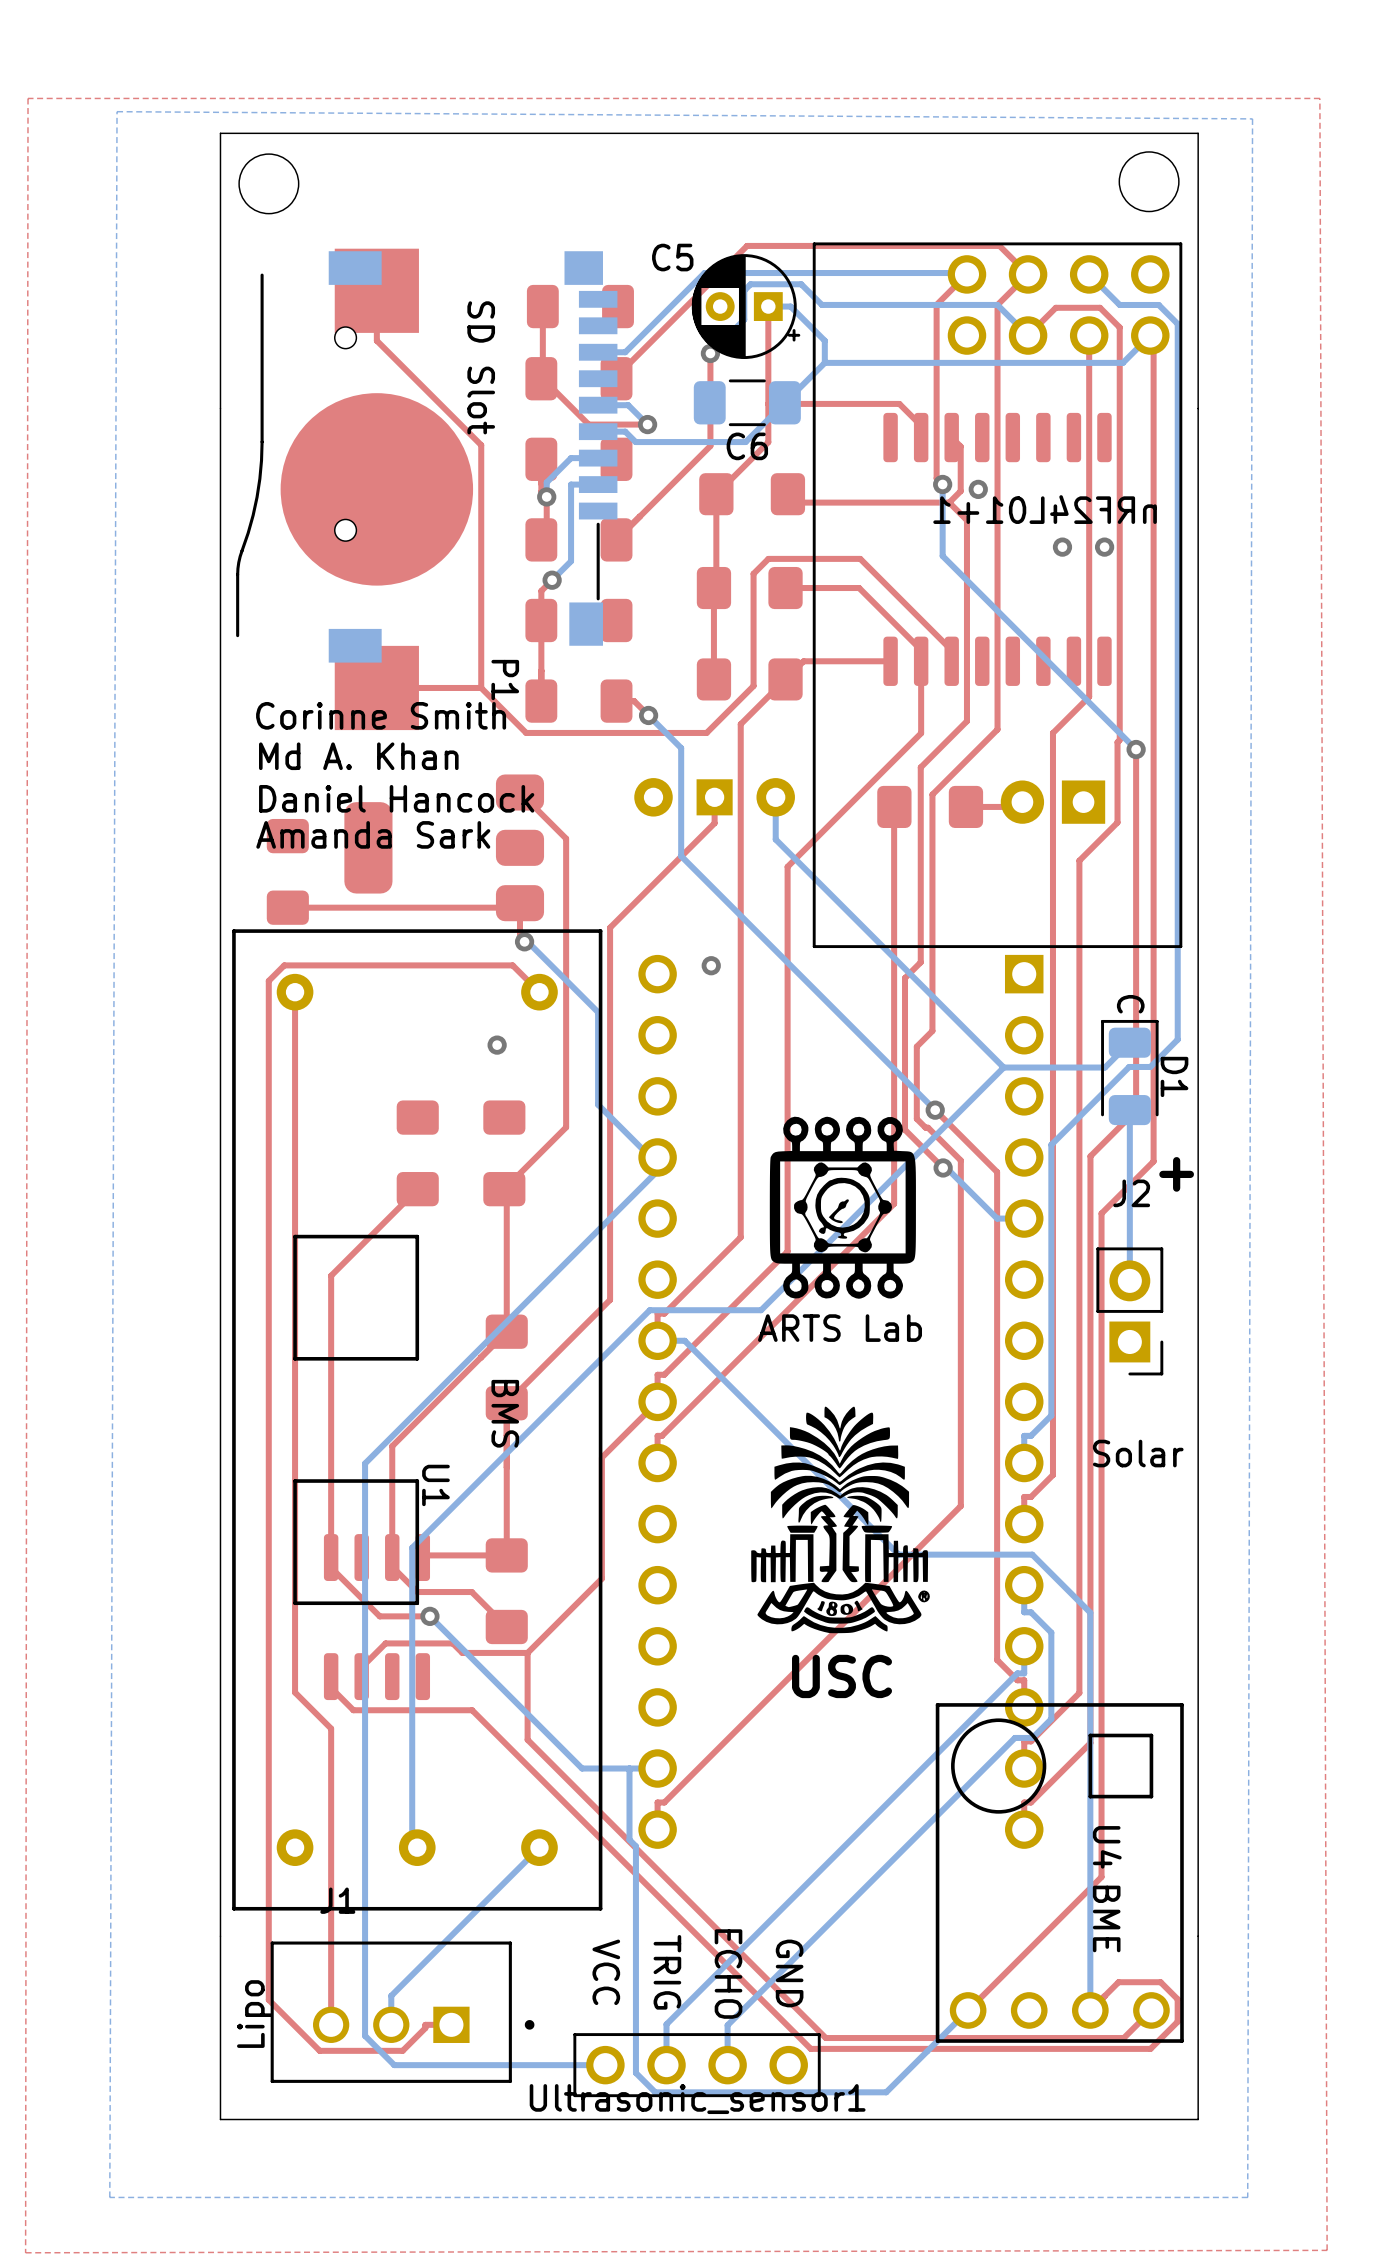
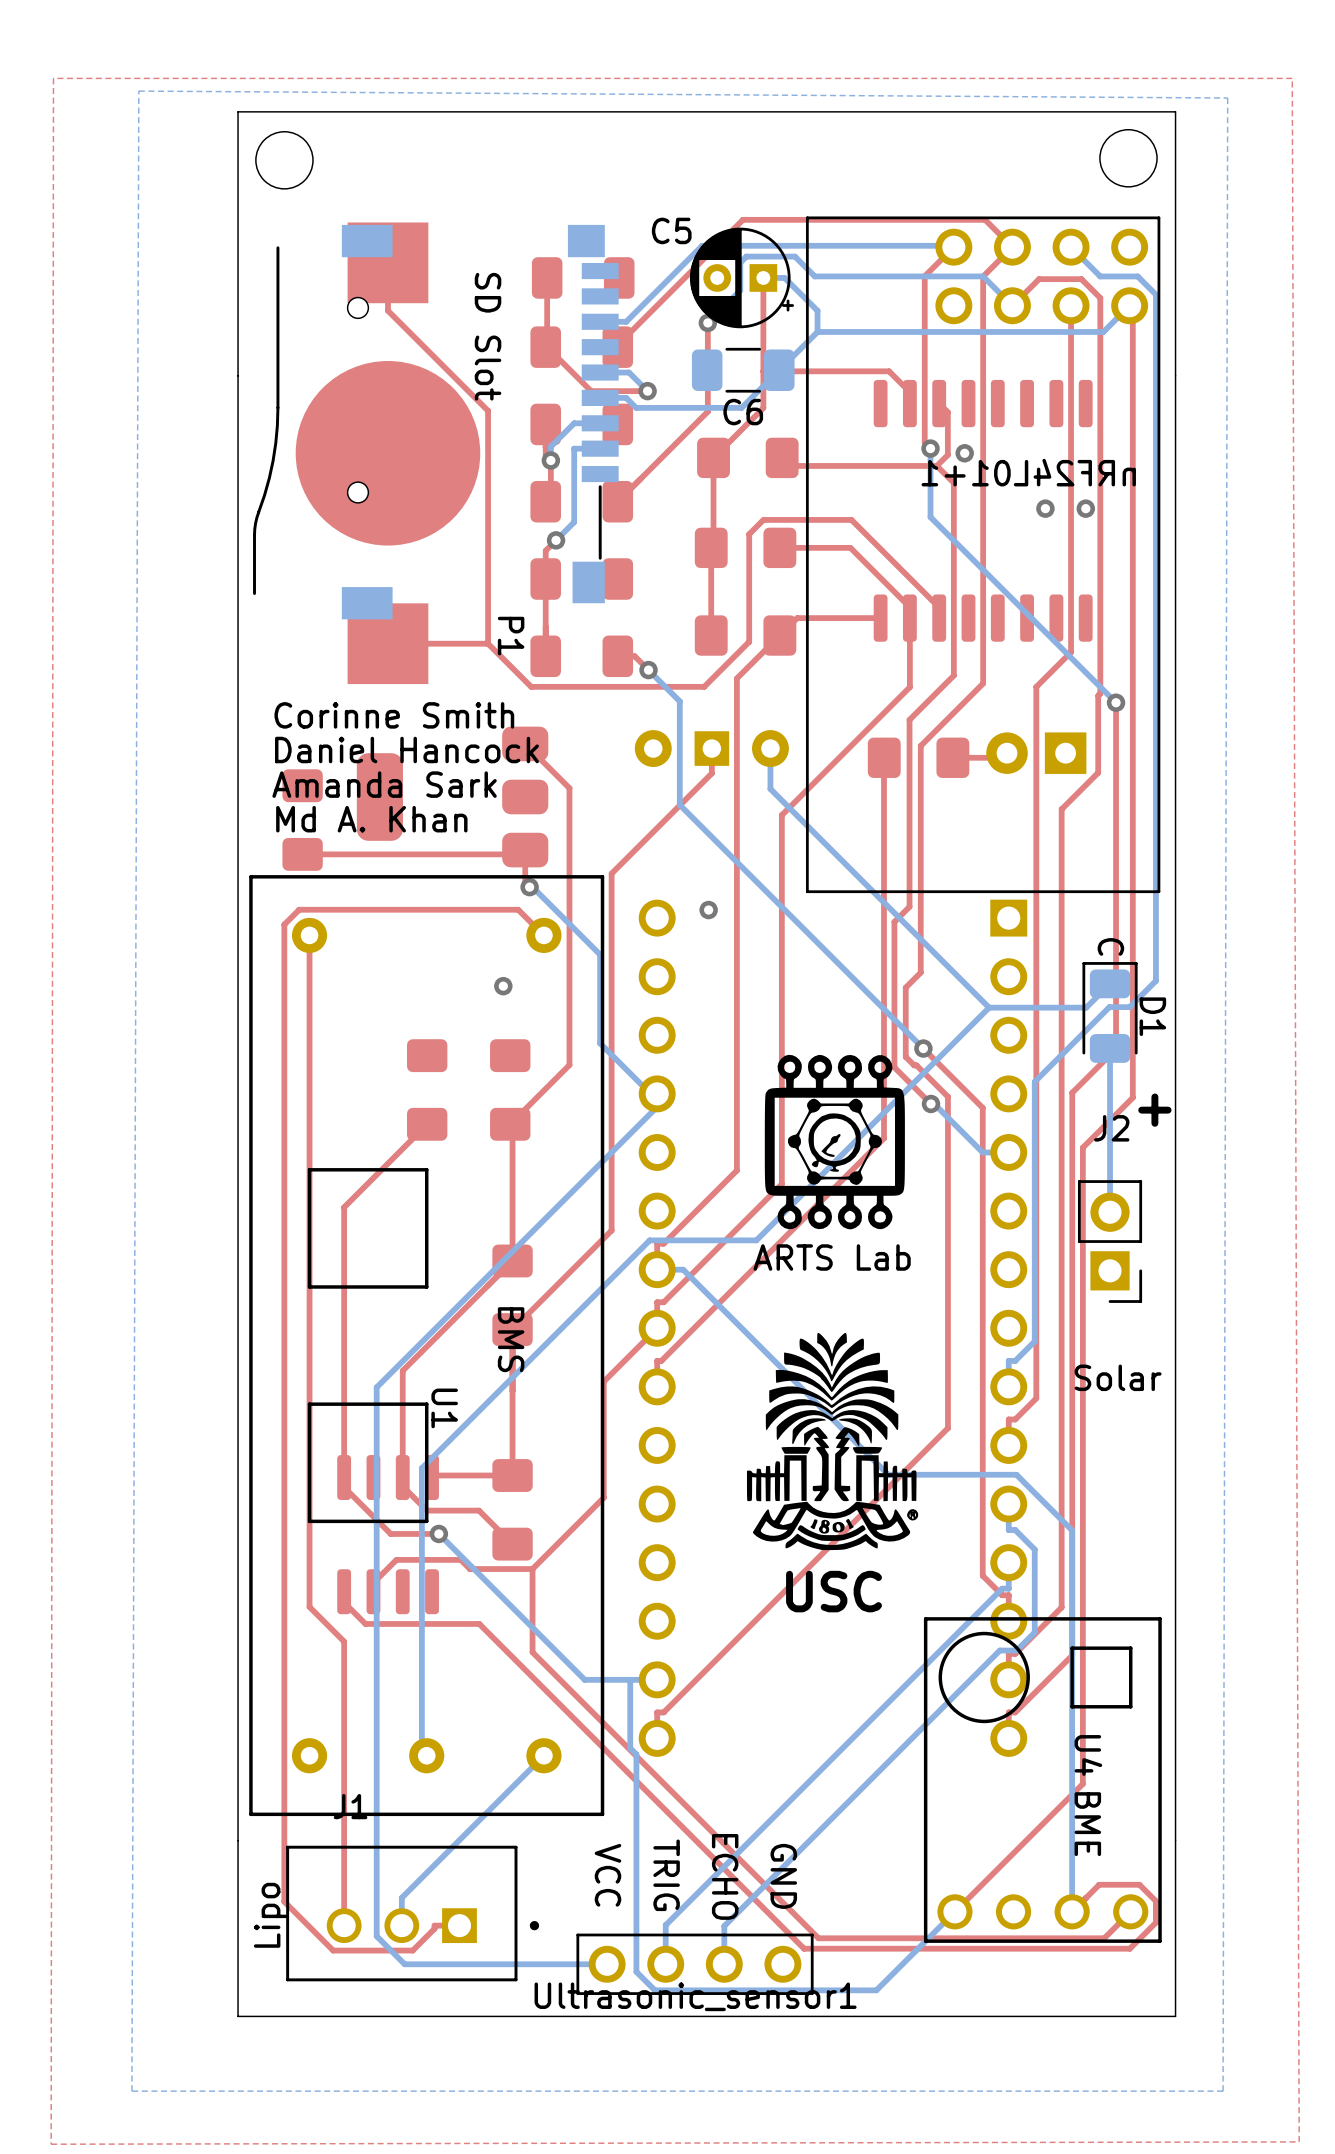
text position: Corinne Smith (381, 715) -> Corinne Smith (394, 715)
text position: Md A. Khan (358, 756) -> Md A. Khan (371, 819)

